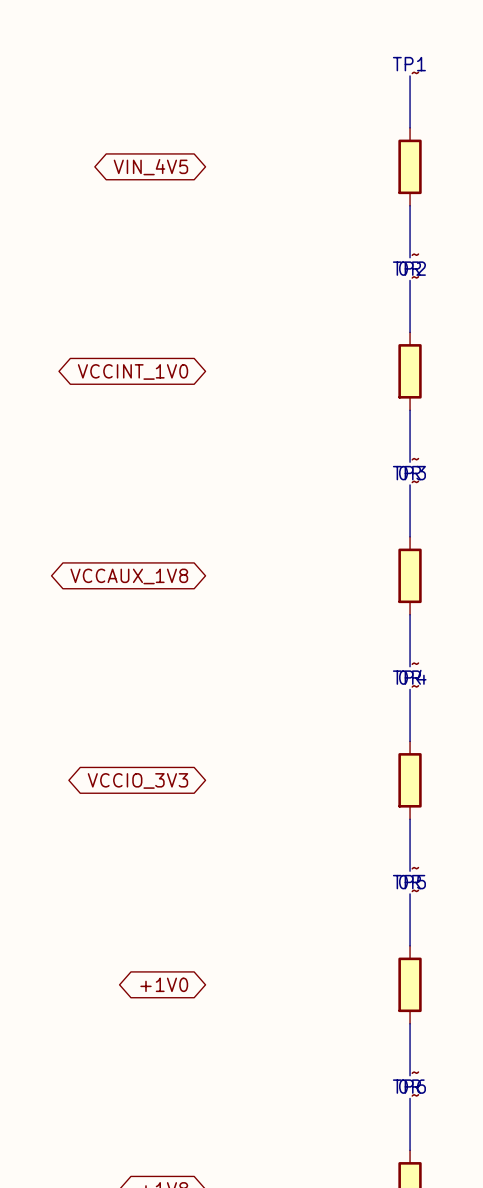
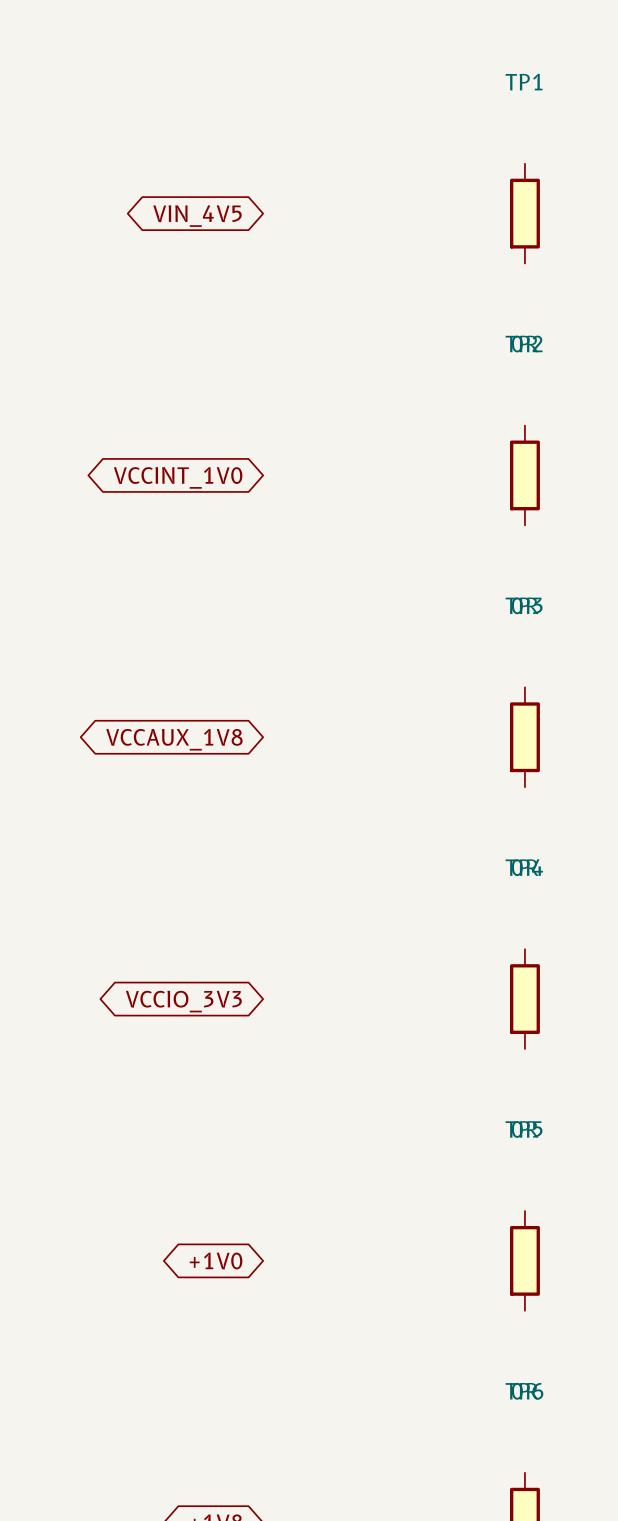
label: ~ (415, 72) -> none
wire: (410, 75) (410, 127) -> none
wire: (410, 205) (410, 257) -> none
label: ~ (415, 254) -> none
label: ~ (415, 277) -> none
wire: (410, 280) (410, 332) -> none
wire: (410, 410) (410, 462) -> none
label: ~ (415, 459) -> none
label: ~ (415, 481) -> none
wire: (410, 484) (410, 536) -> none
wire: (410, 614) (410, 666) -> none
label: ~ (415, 663) -> none
label: ~ (415, 686) -> none
wire: (410, 689) (410, 741) -> none
wire: (410, 819) (410, 871) -> none
label: ~ (415, 868) -> none
label: ~ (415, 890) -> none
wire: (410, 893) (410, 945) -> none
wire: (410, 1023) (410, 1075) -> none
label: ~ (415, 1072) -> none
label: ~ (415, 1095) -> none
wire: (410, 1098) (410, 1150) -> none

